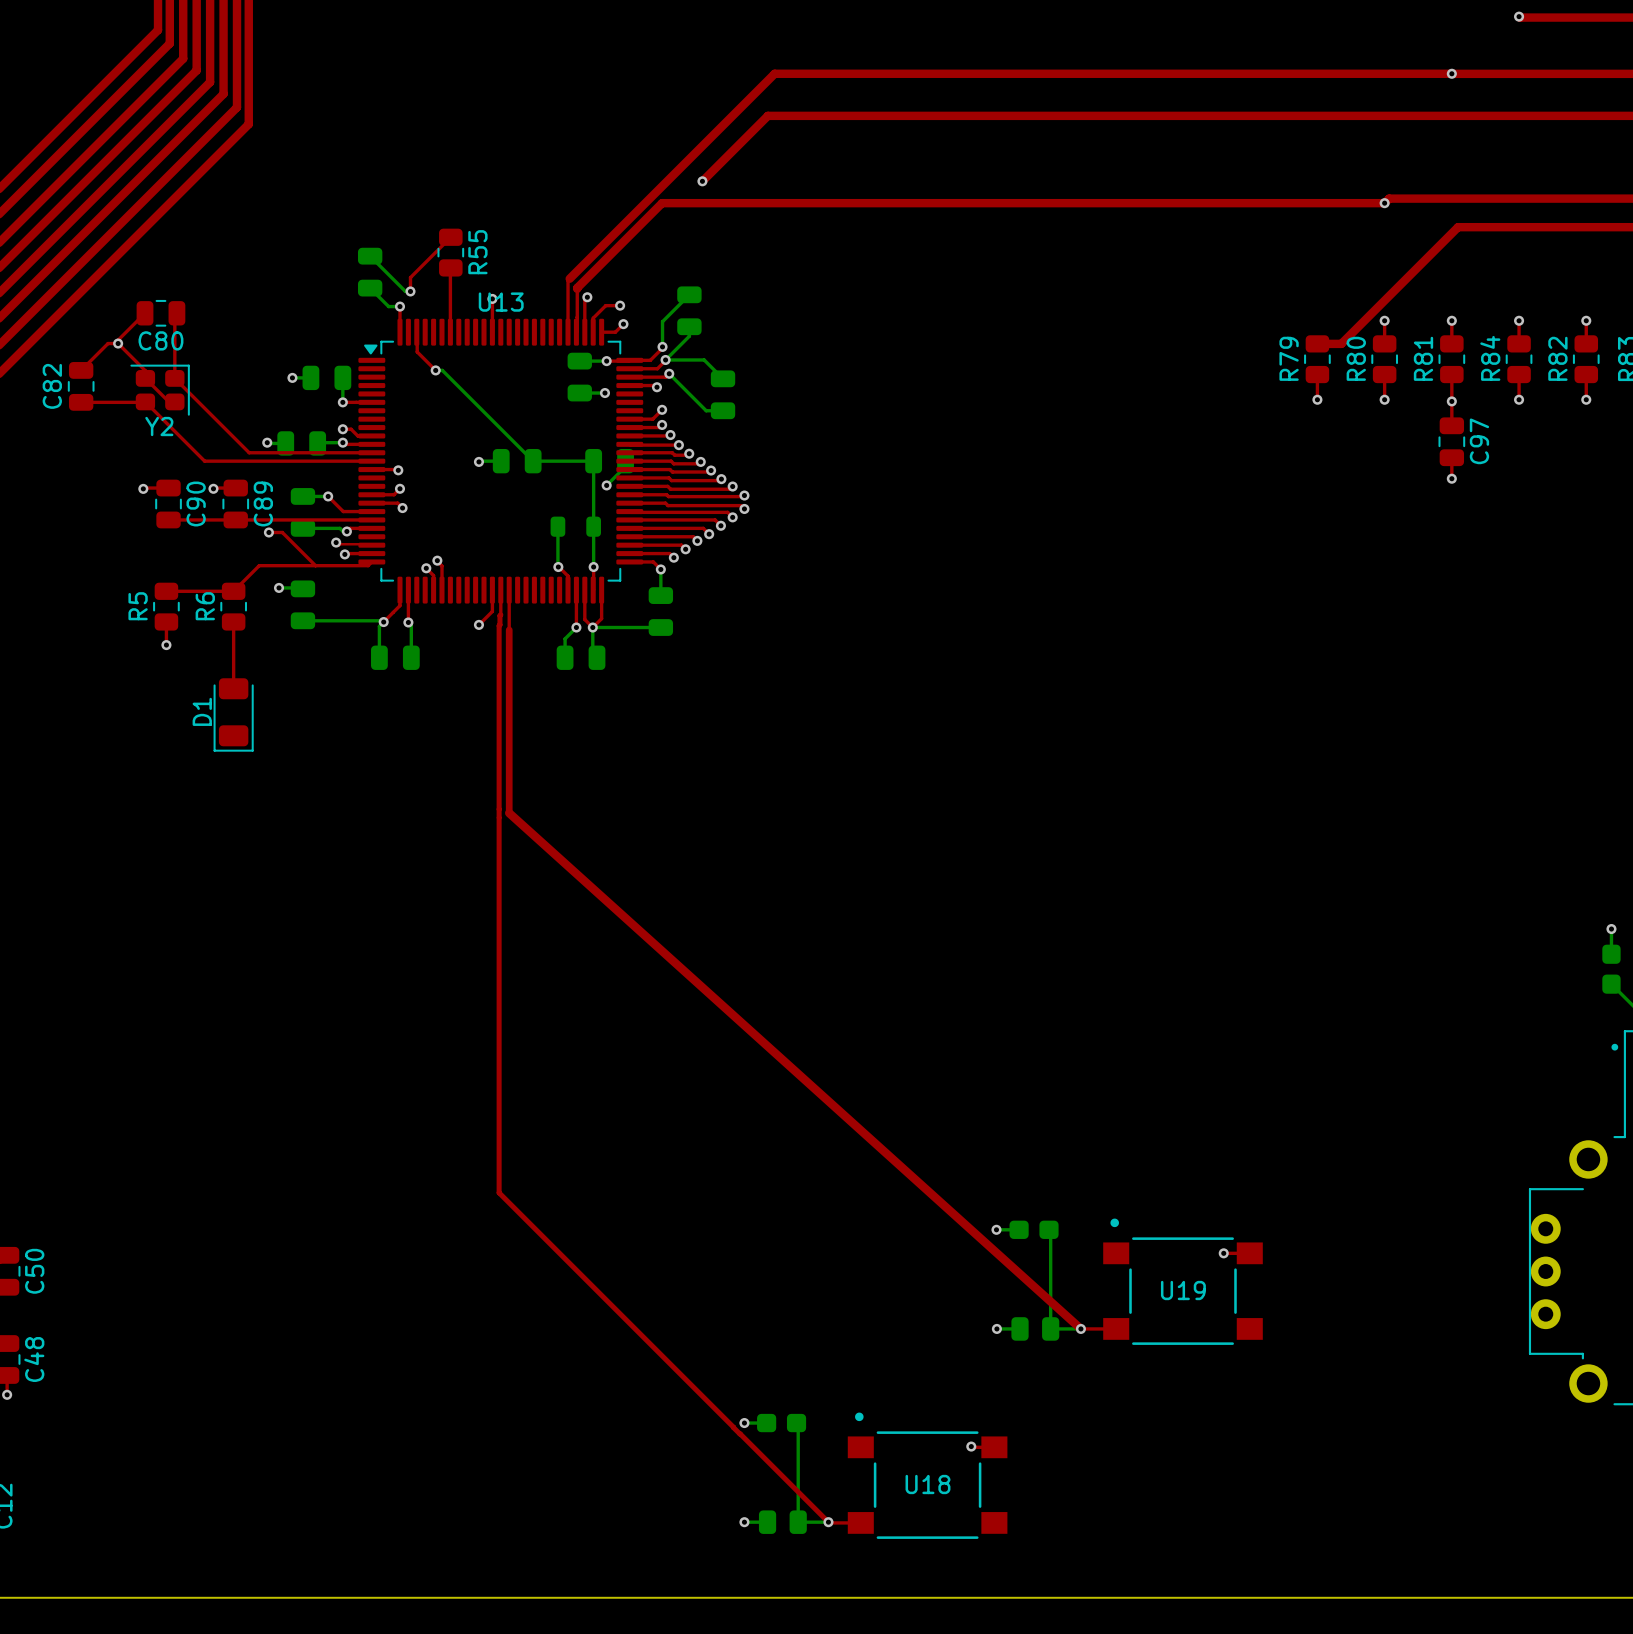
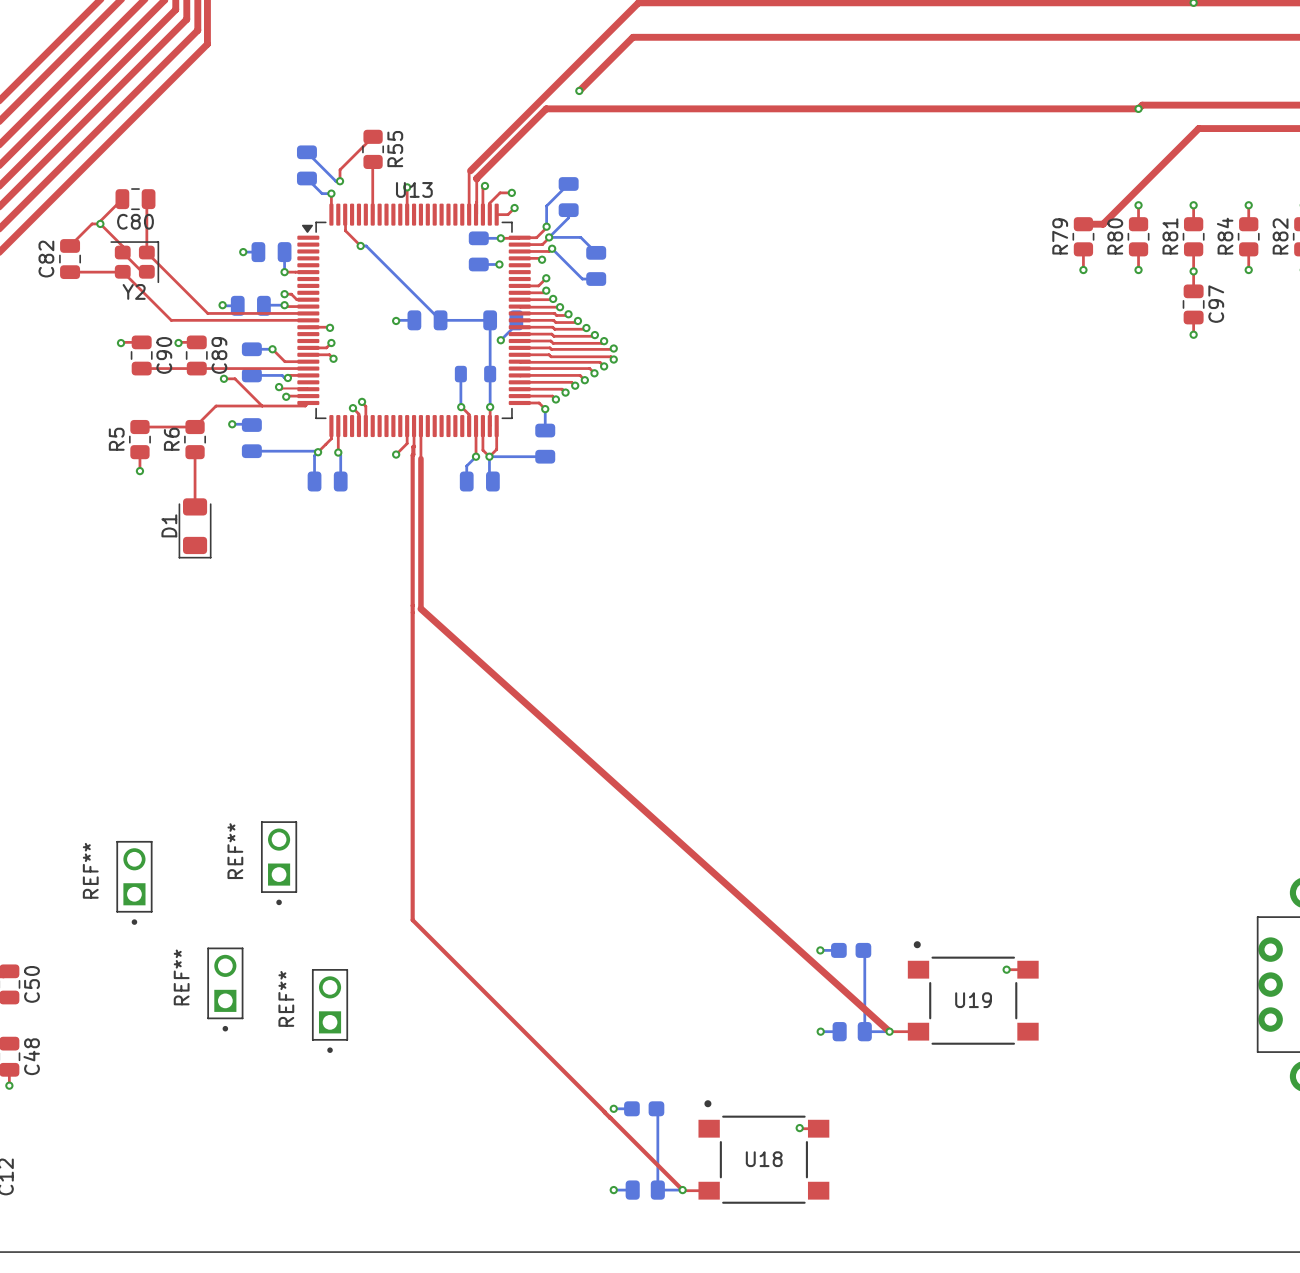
REF**: none -> (279, 863)
REF**: none -> (134, 882)
REF**: none -> (225, 989)
REF**: none -> (330, 1010)

